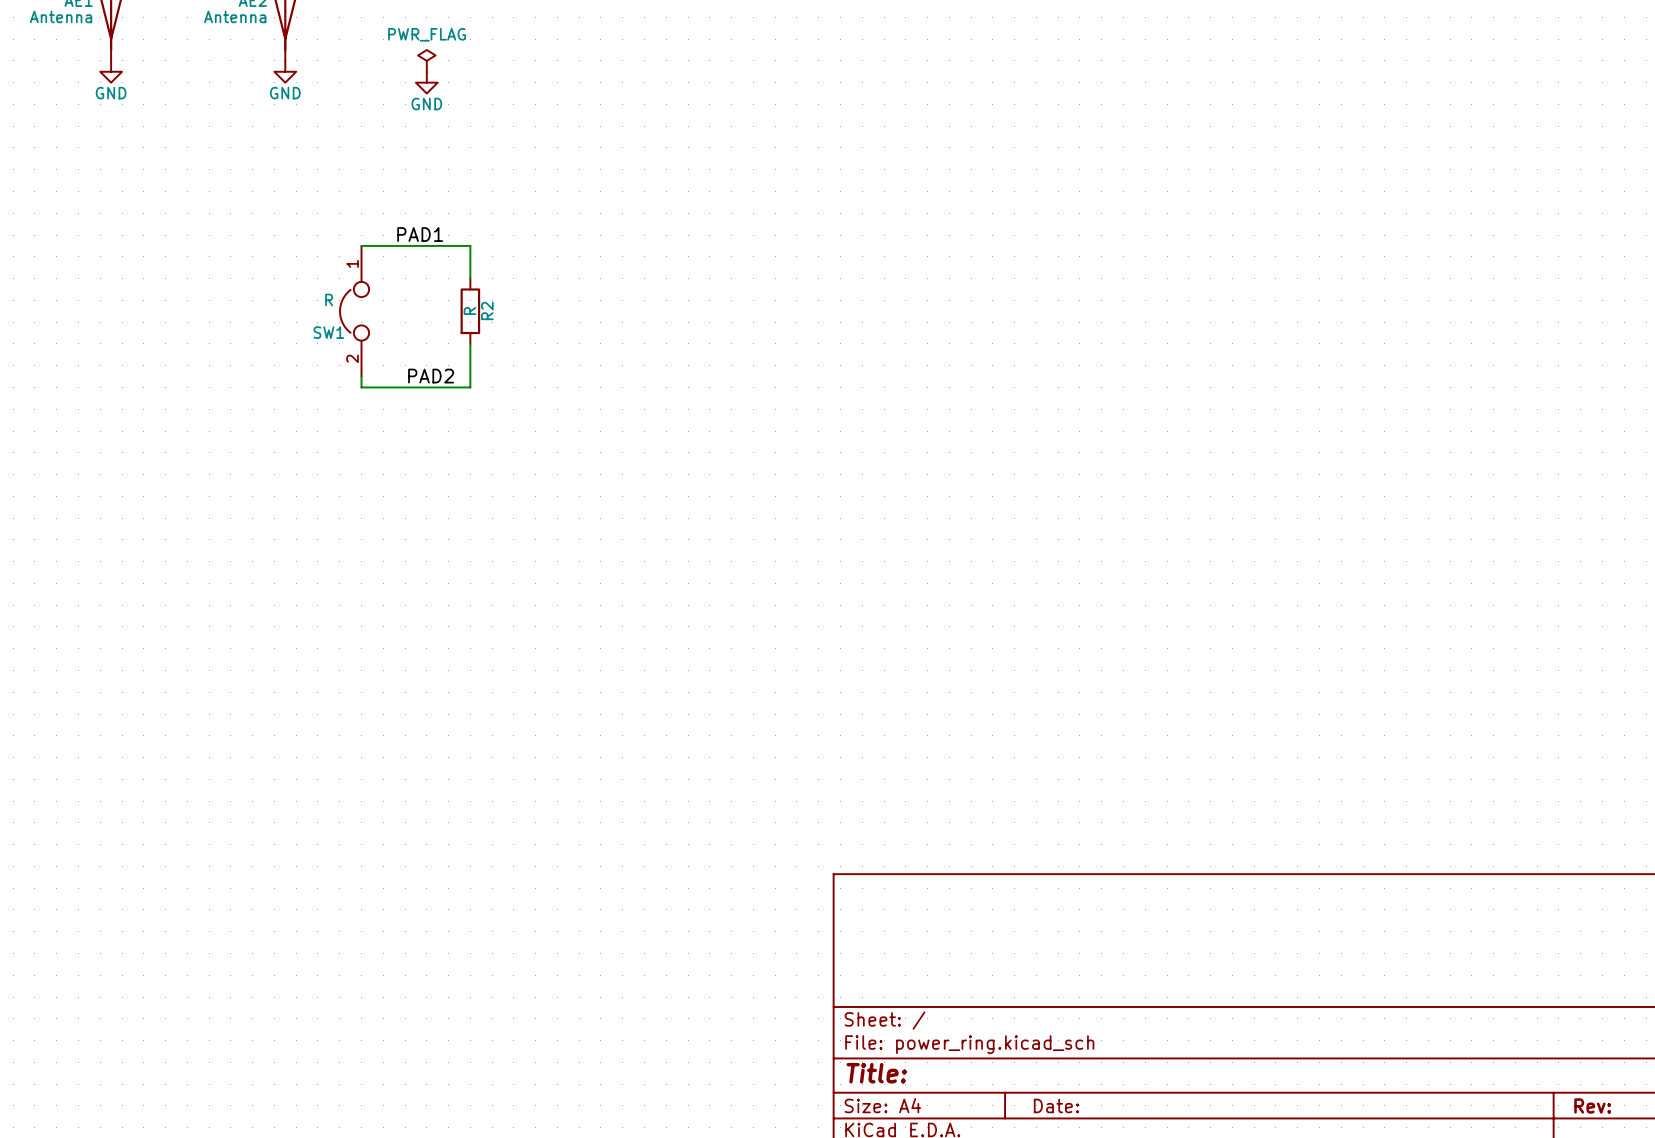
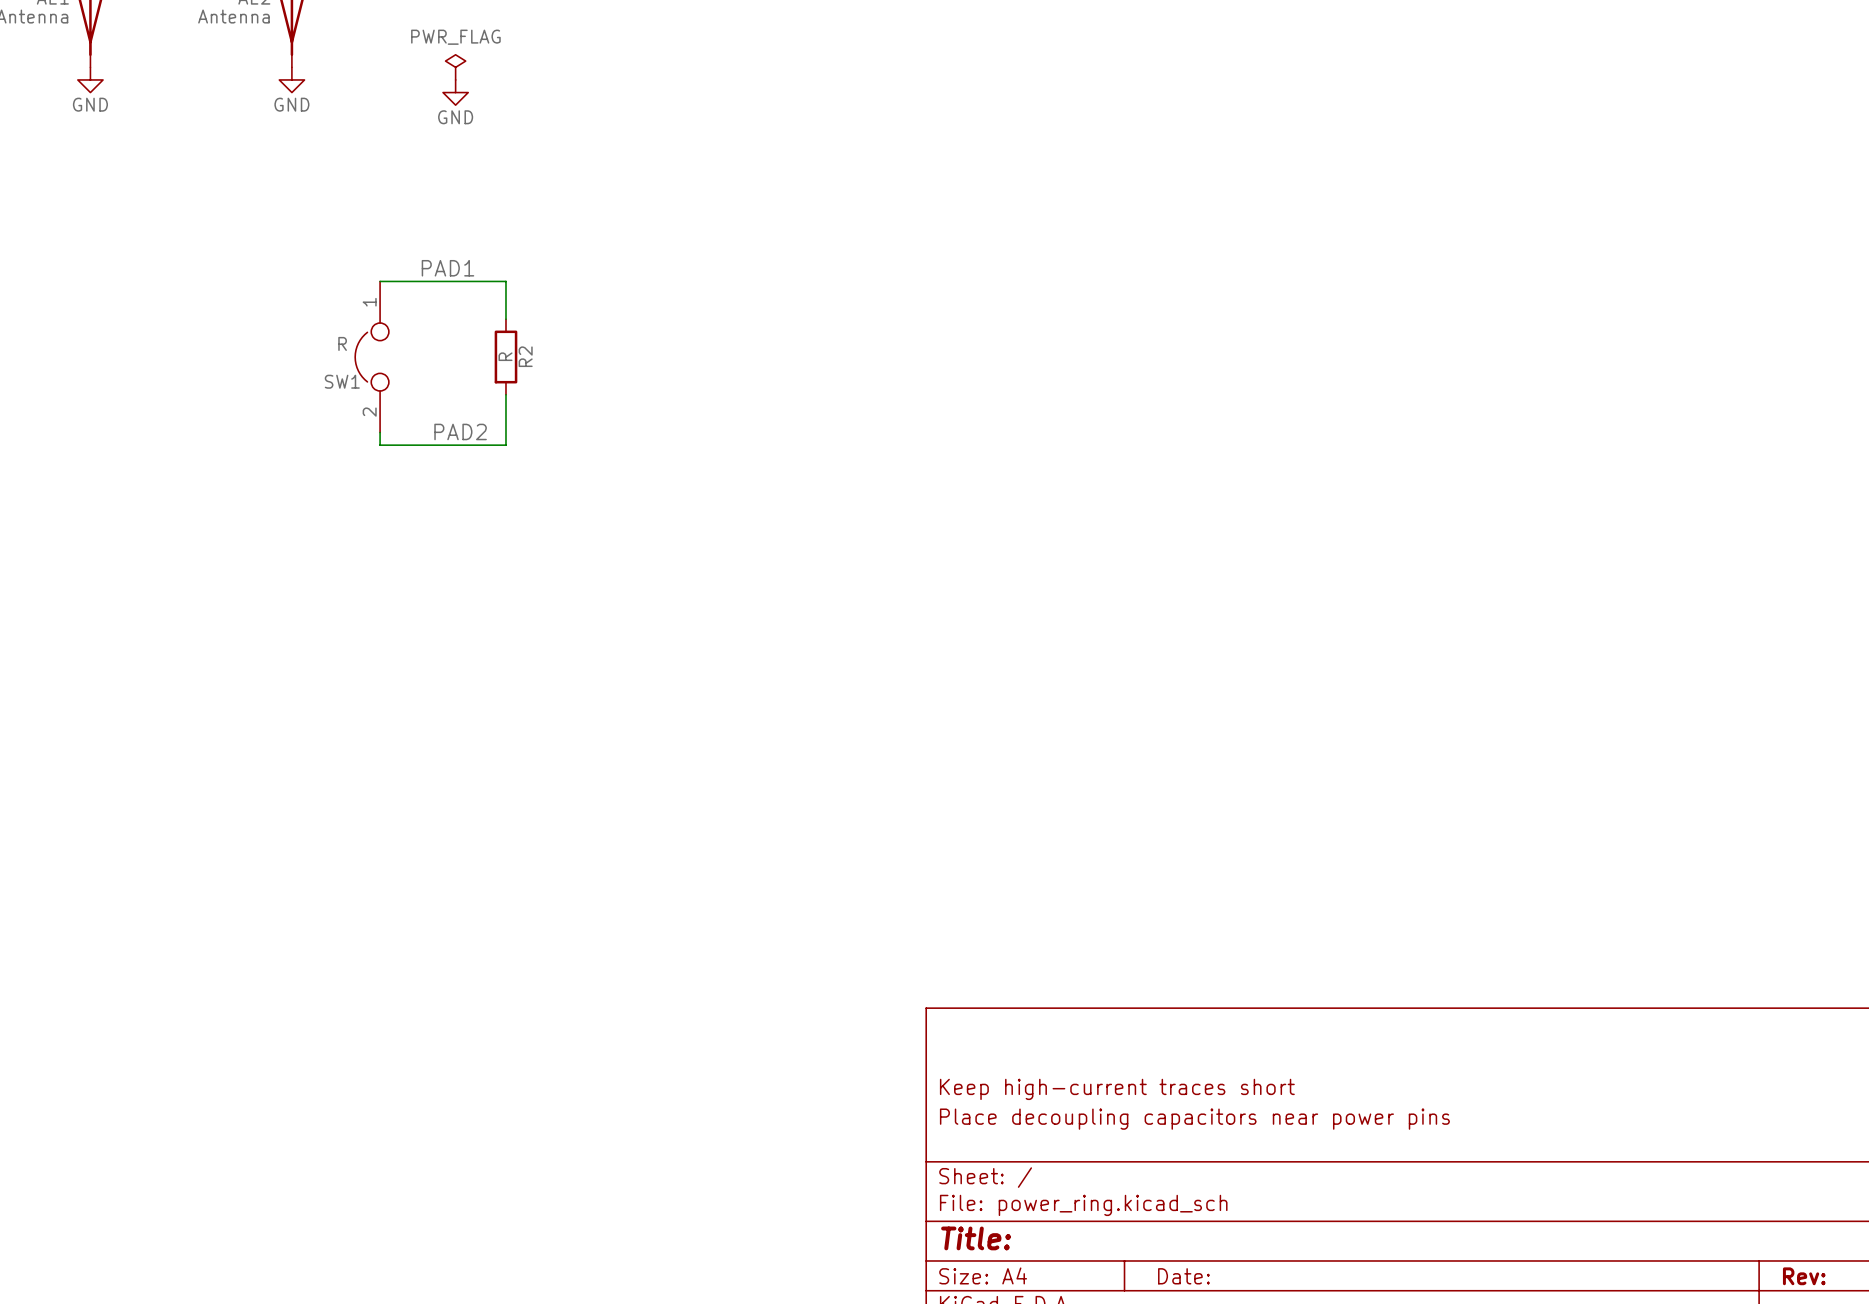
title block: none -> Keep high-current traces short (1117, 1089)
title block: none -> Place decoupling capacitors near power pins (1194, 1119)

